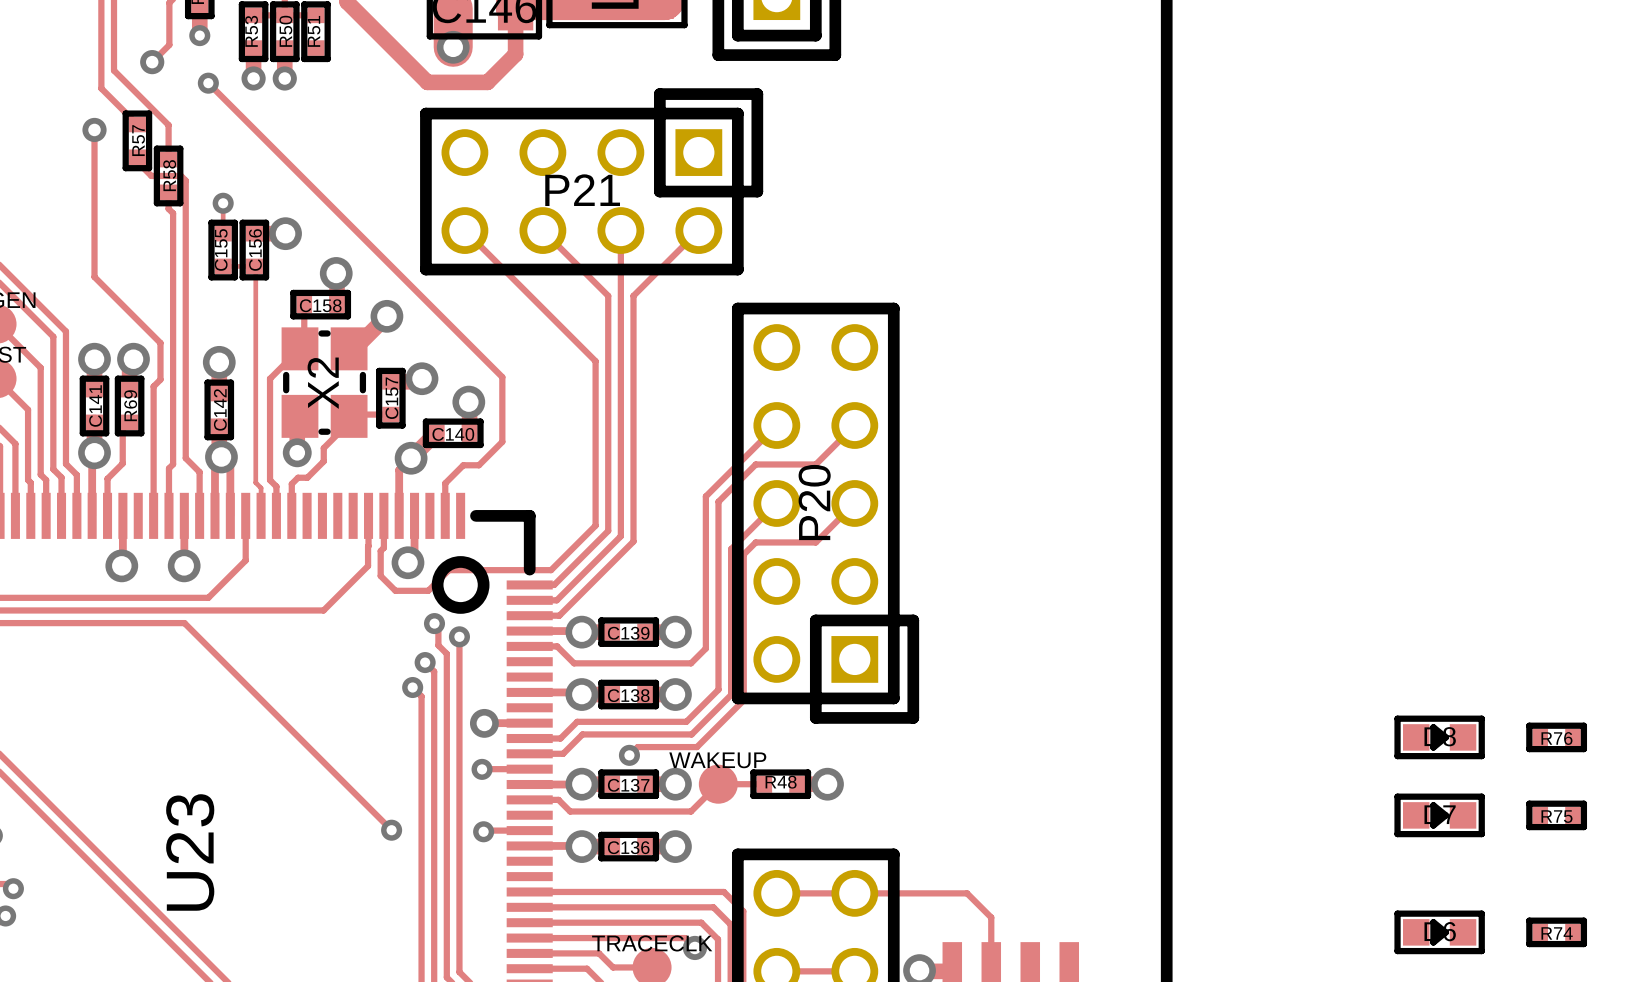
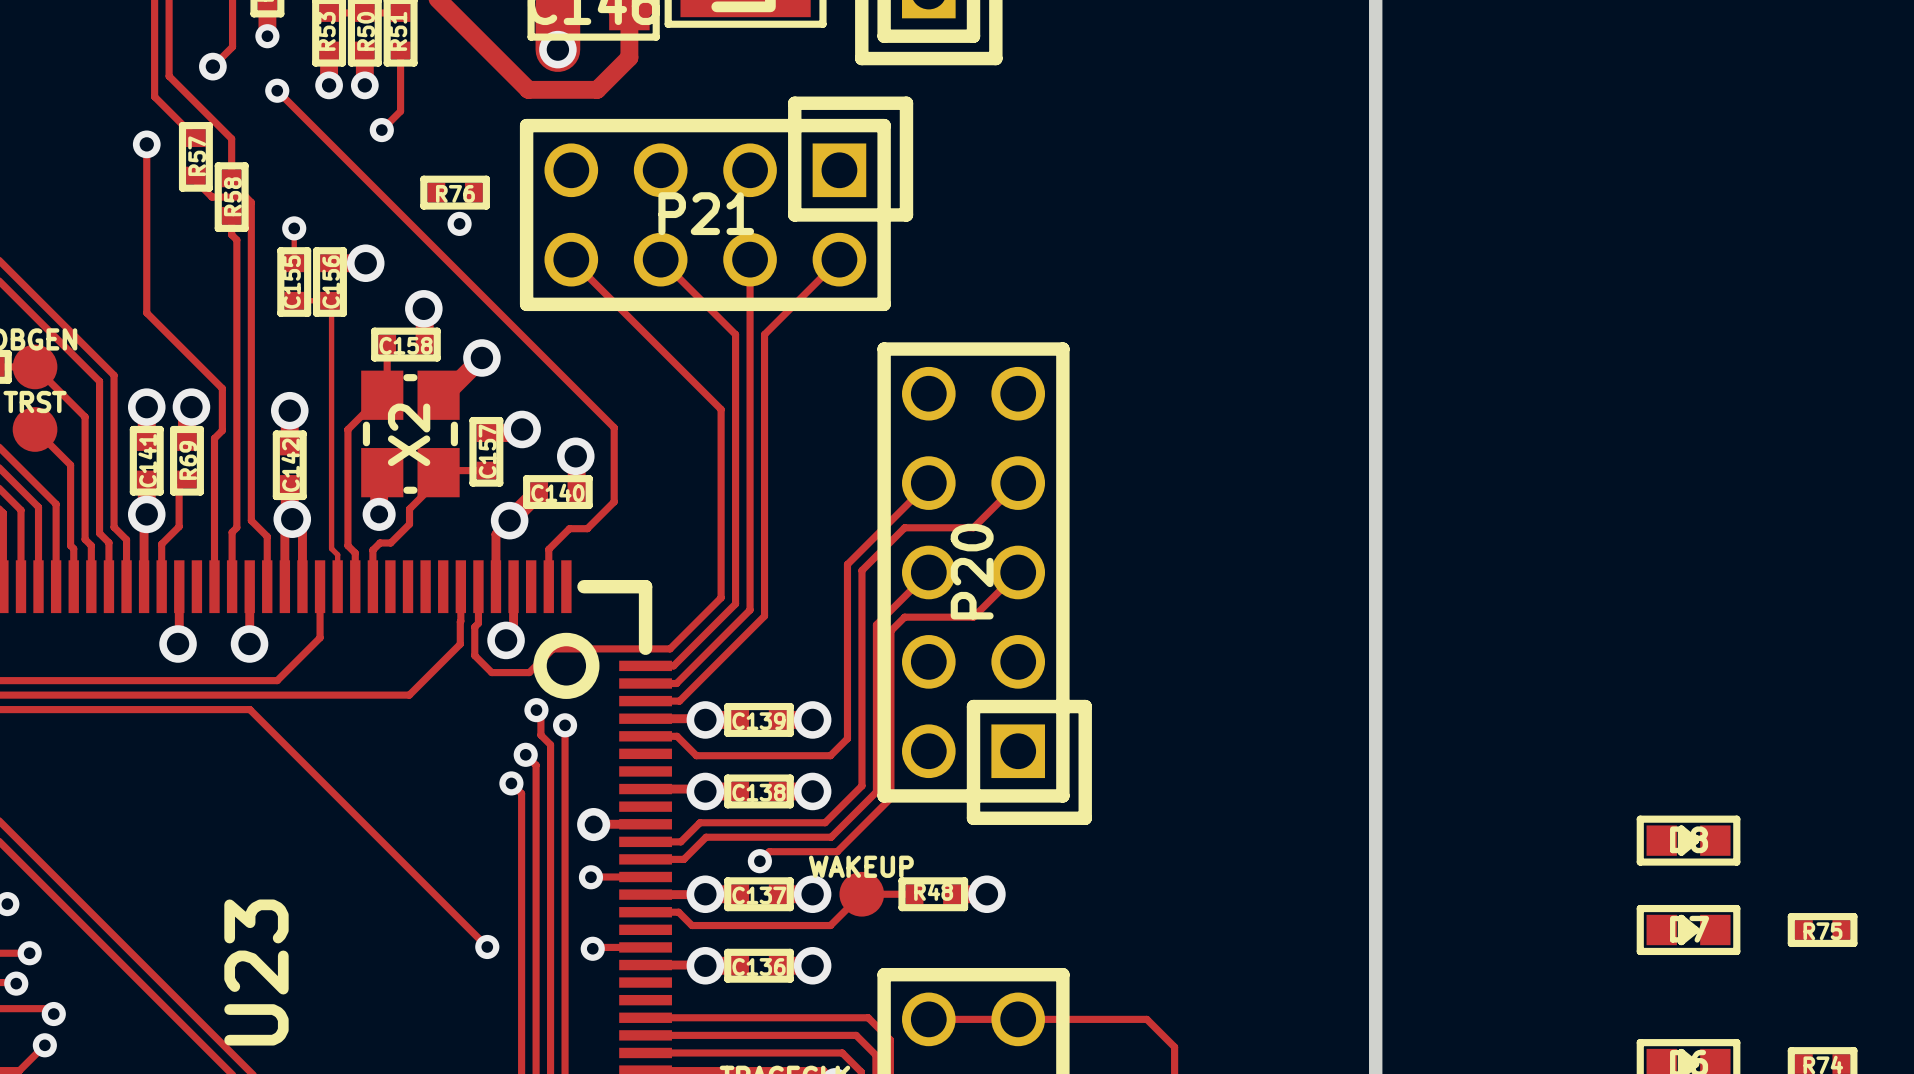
track: none -> (400, 50) (400, 111) (381, 130)
via: none -> (381, 130)
via: none -> (459, 223)
R76 position: (1556, 737) -> (455, 192)

